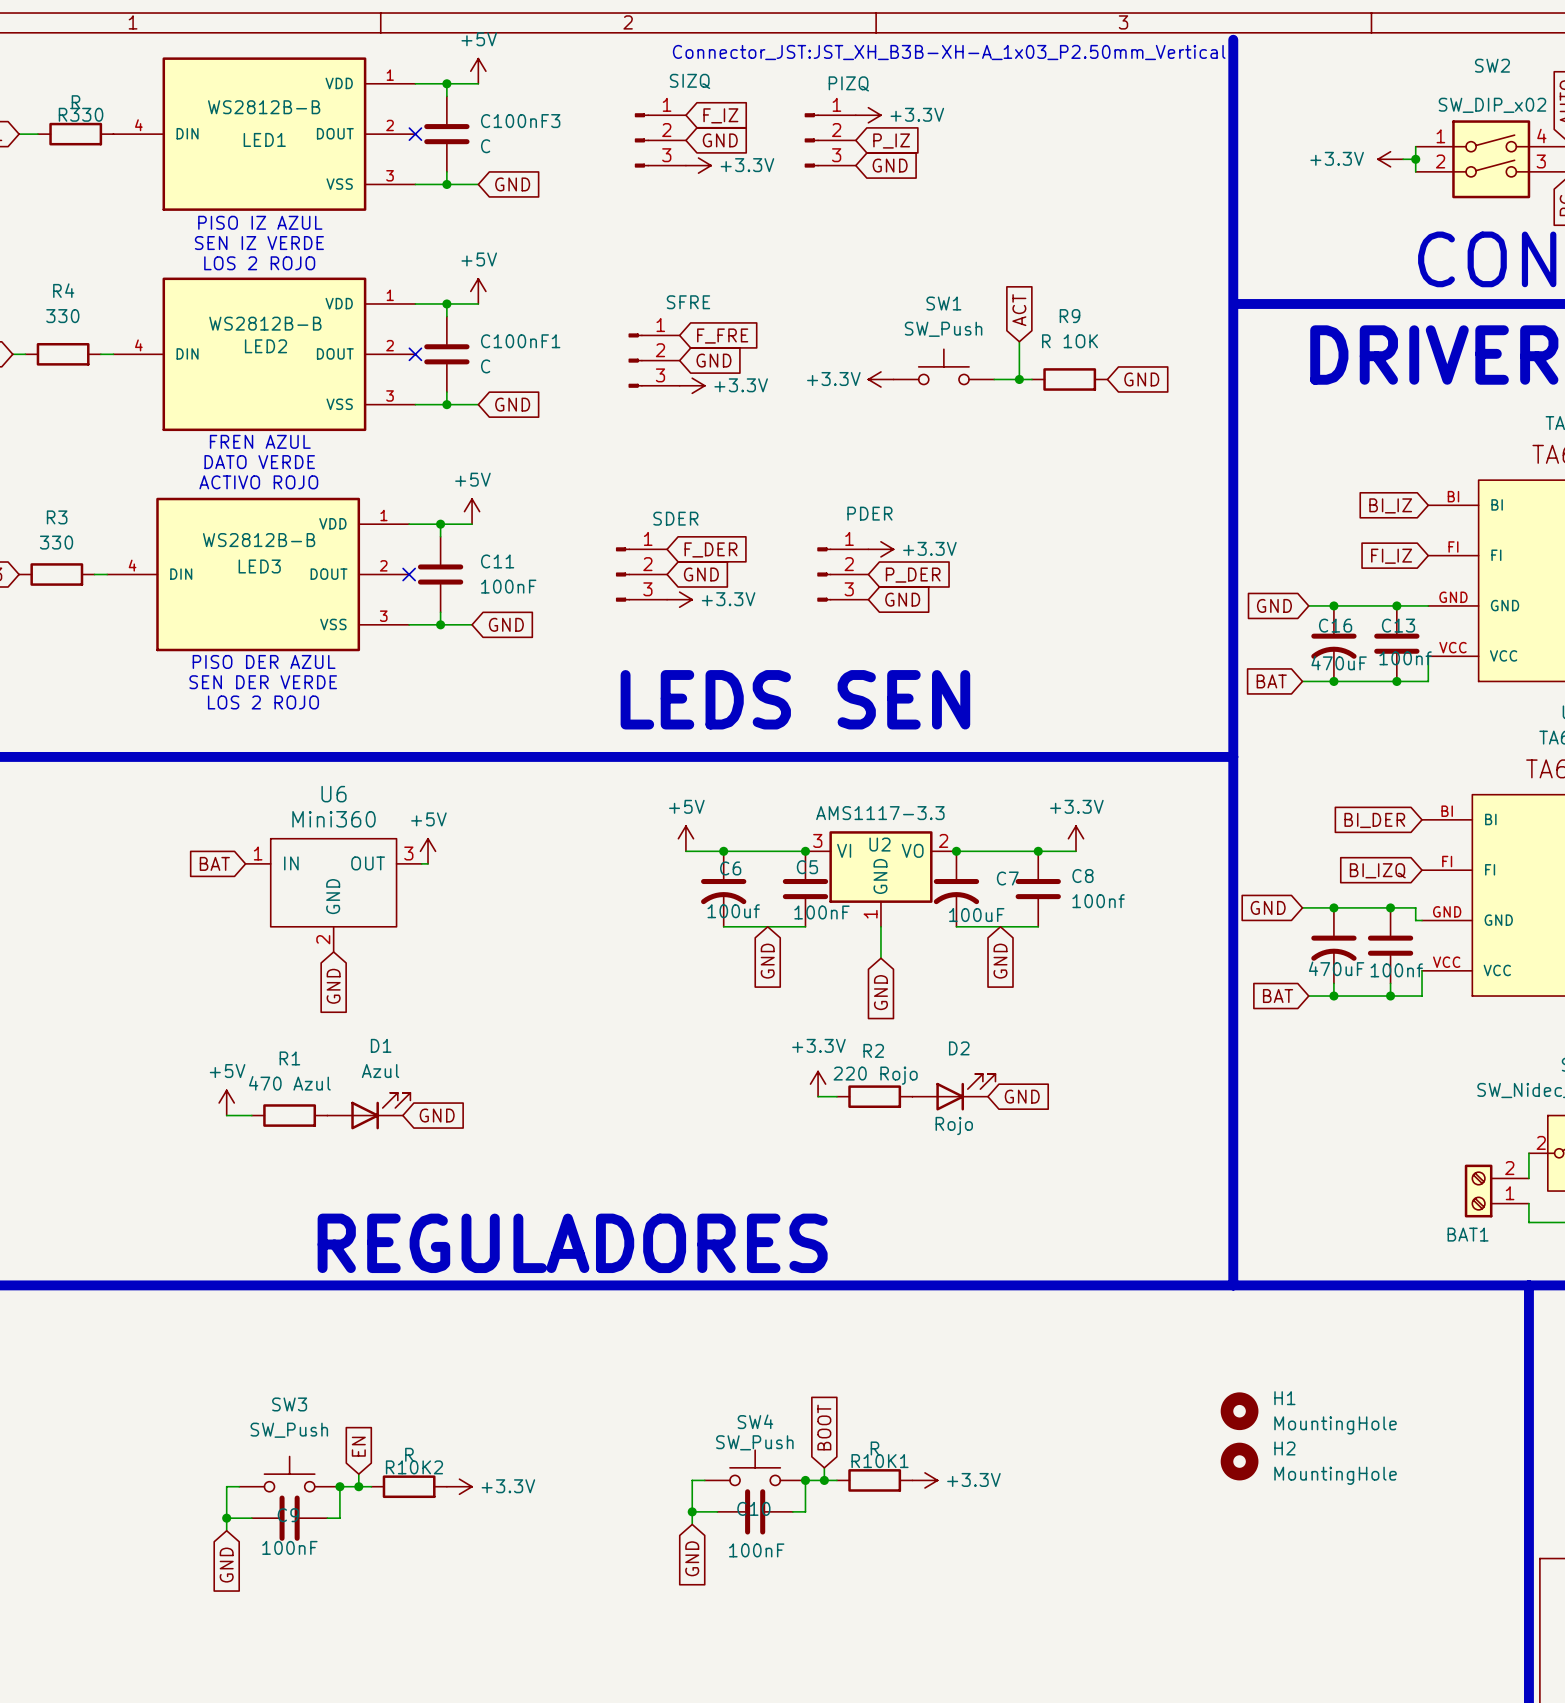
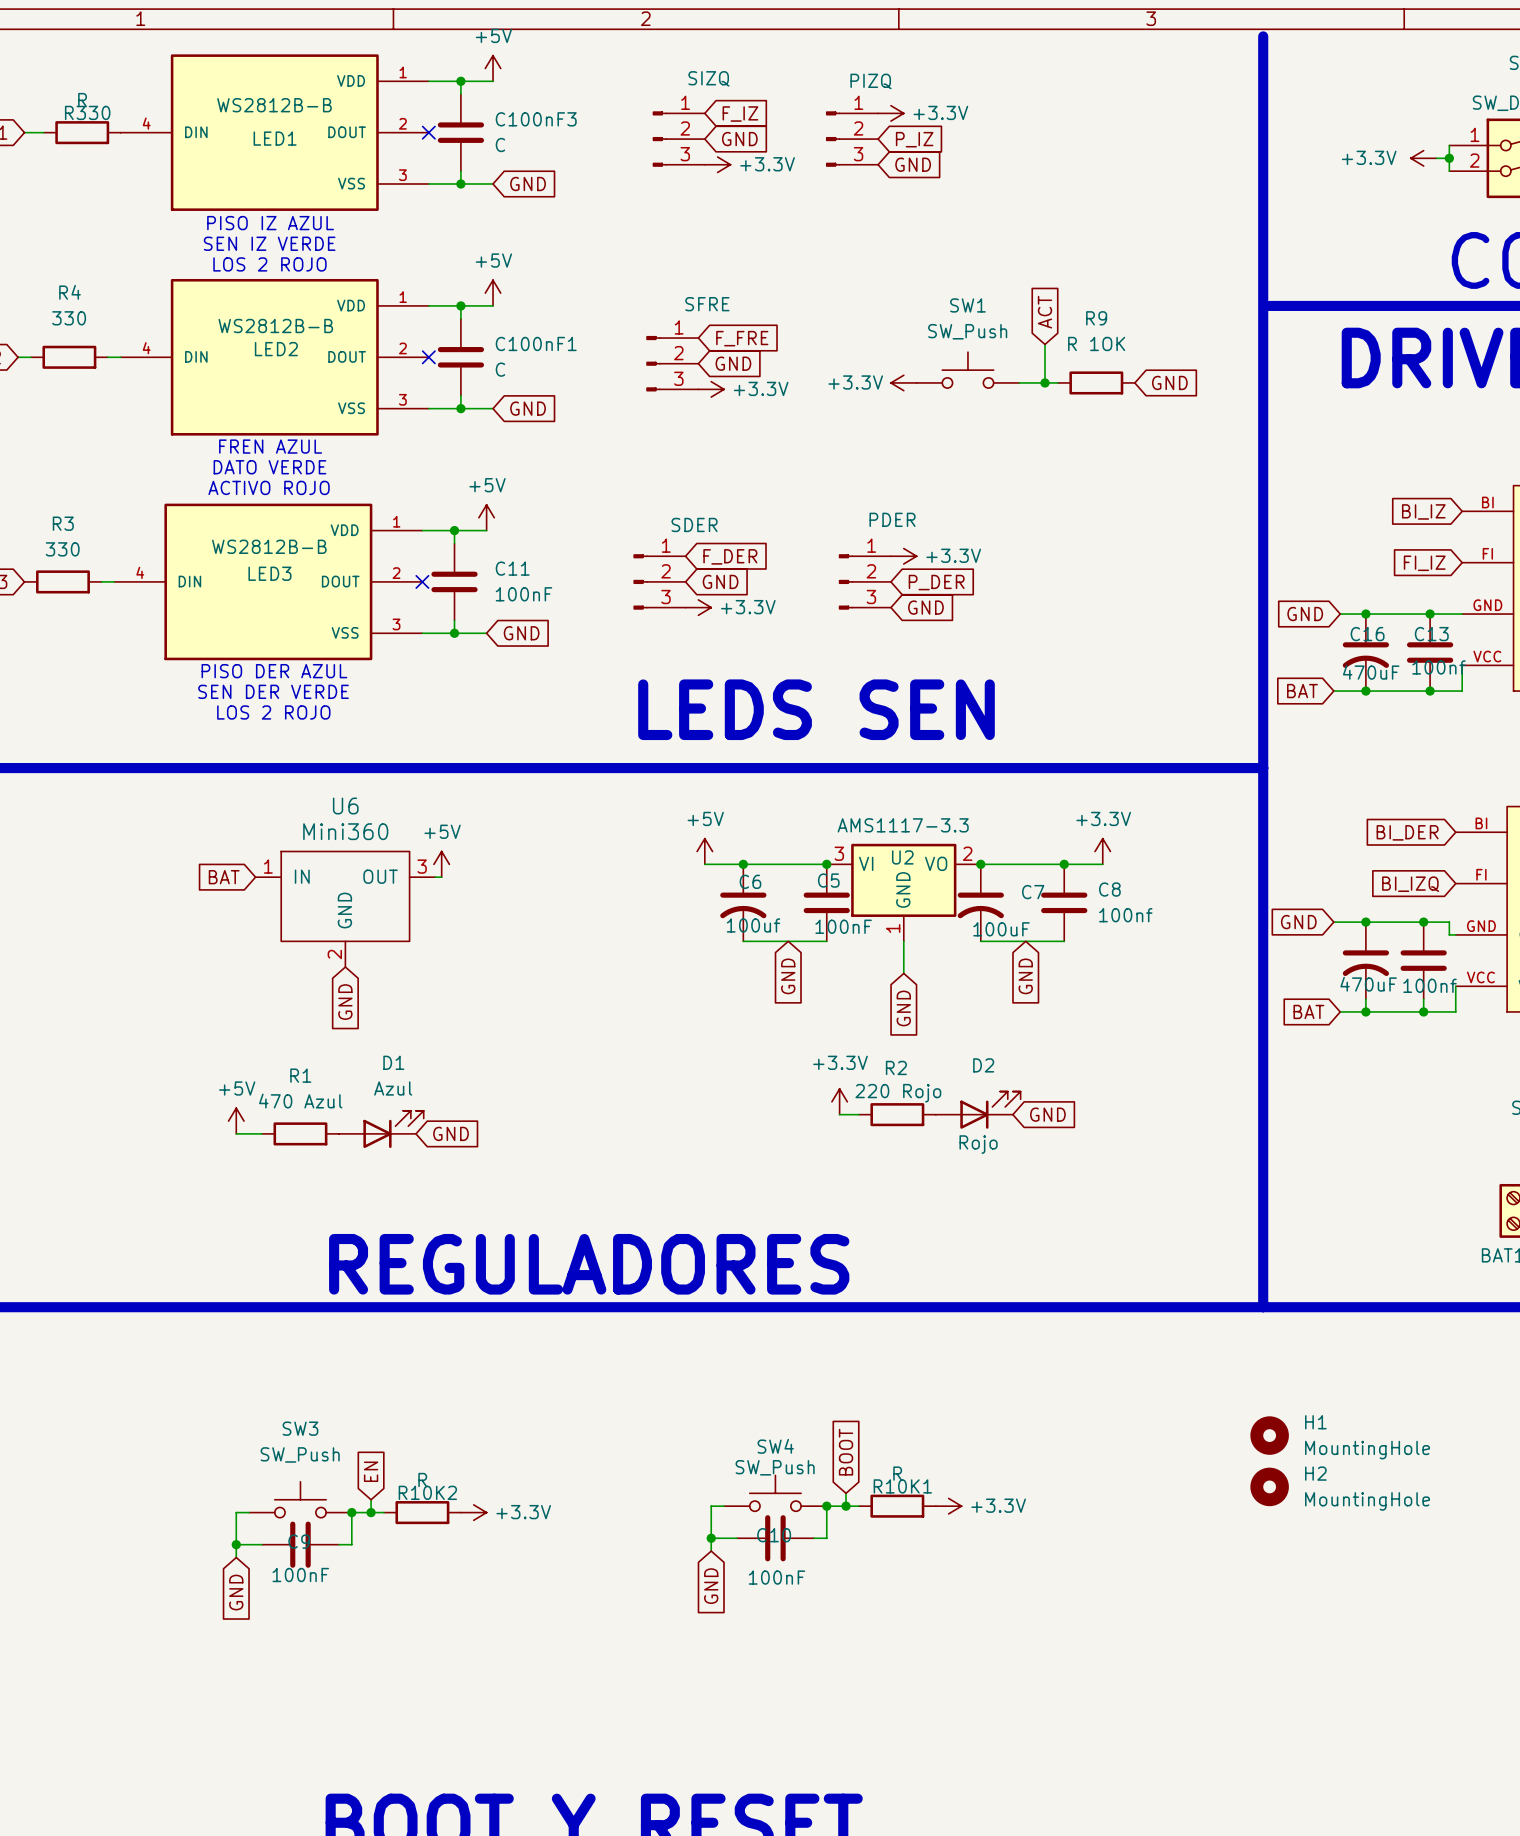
text: Connector_JST:JST_XH_B3B-XH-A_1x03_P2.50mm_Vertical (949, 52) -> none

